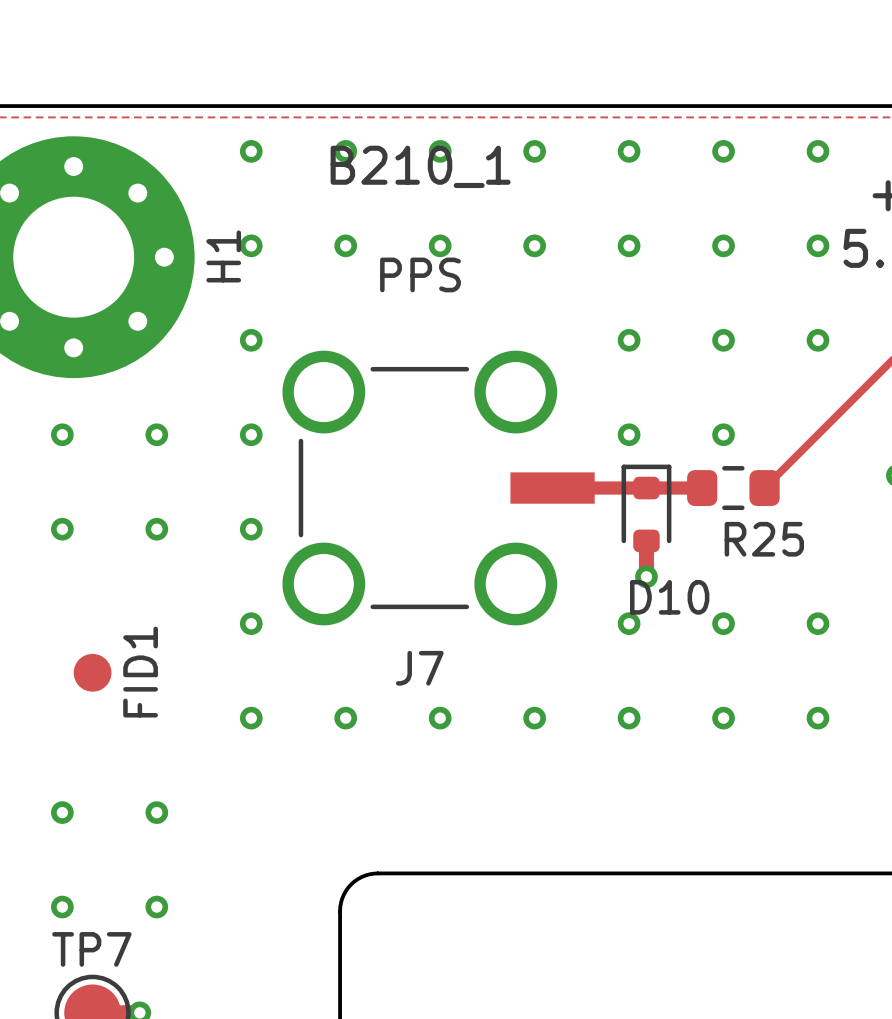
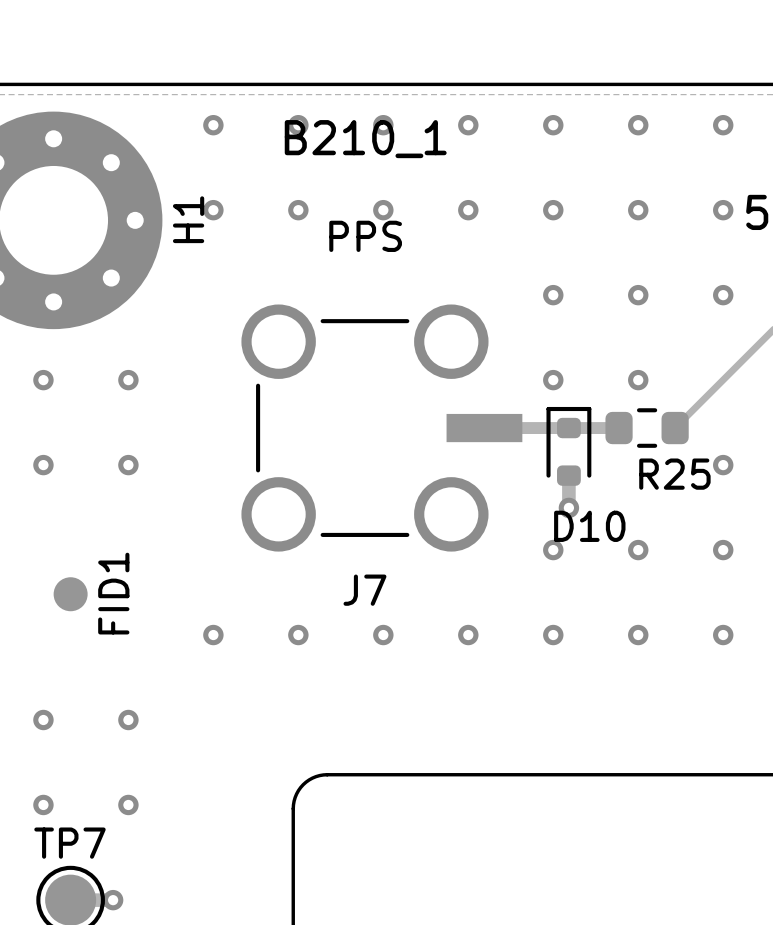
via: (251, 340) -> none
via: (251, 434) -> none
via: (251, 529) -> none
via: none -> (723, 465)
via: (251, 623) -> none

